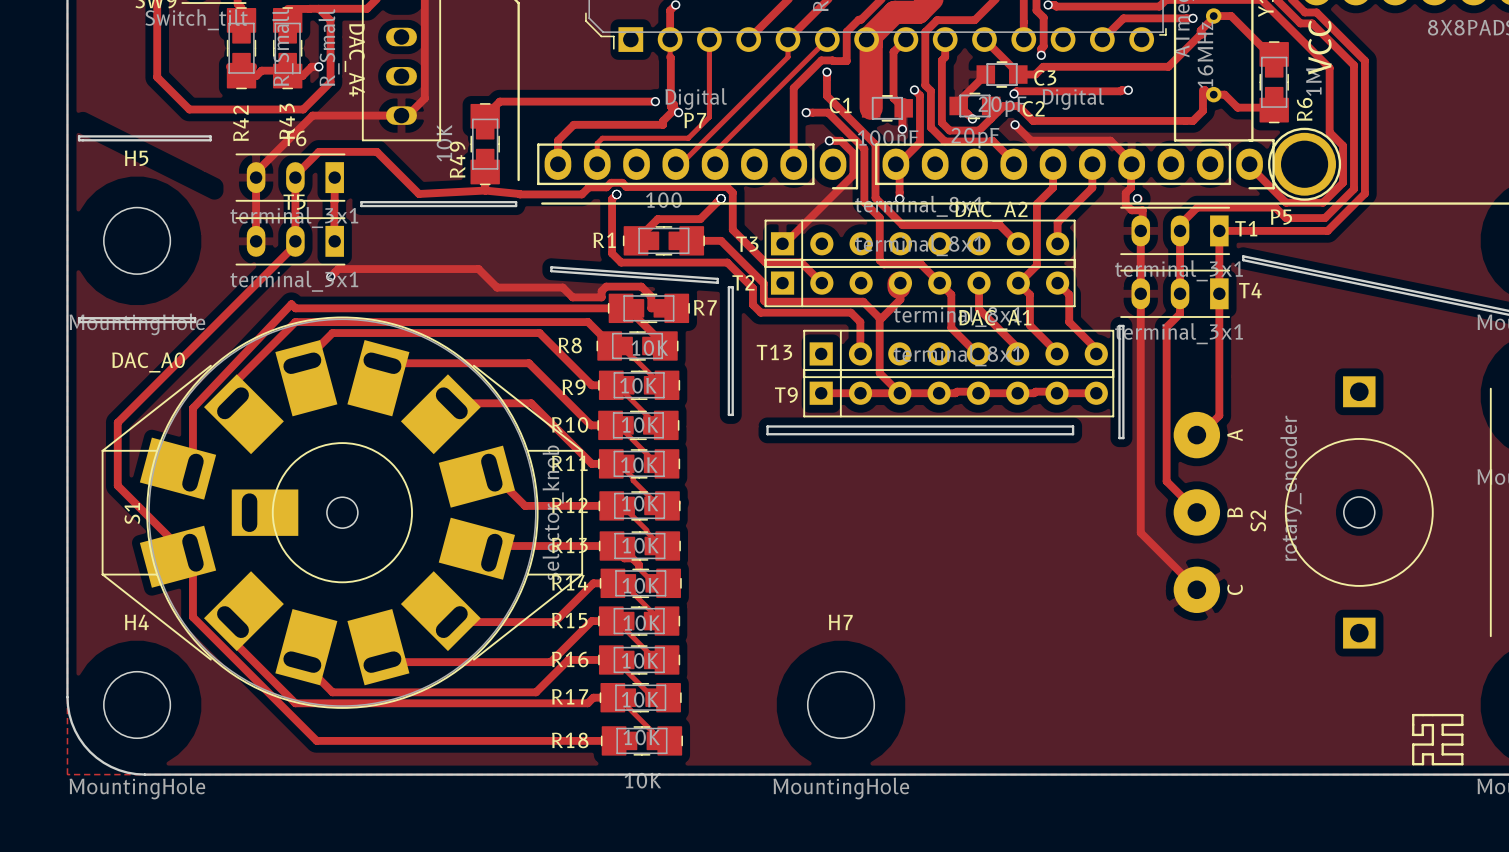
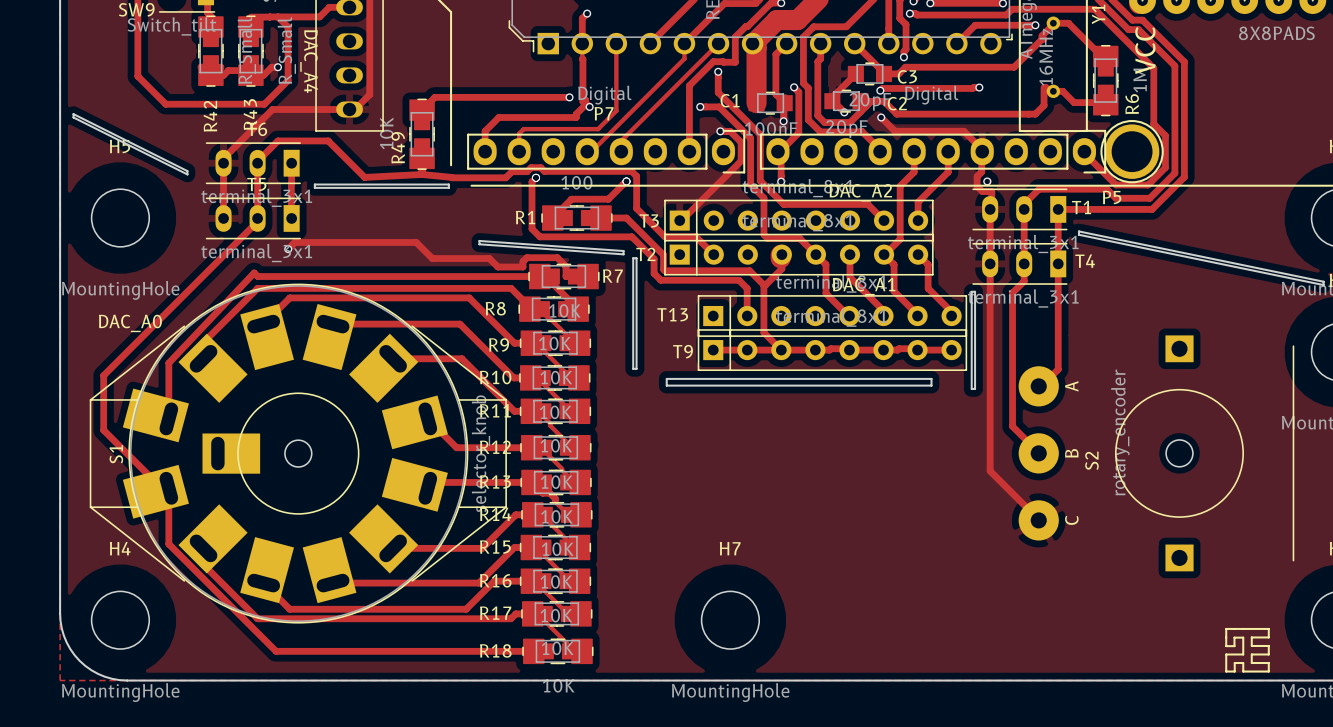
board edge: none -> (73, 114) (73, 117) (187, 174) (187, 171) (73, 114)
board edge: (79, 136) (79, 140) (210, 140) (210, 136) (79, 136) -> none
board edge: (79, 318) (195, 318) (195, 322) (79, 322) (79, 318) -> none

